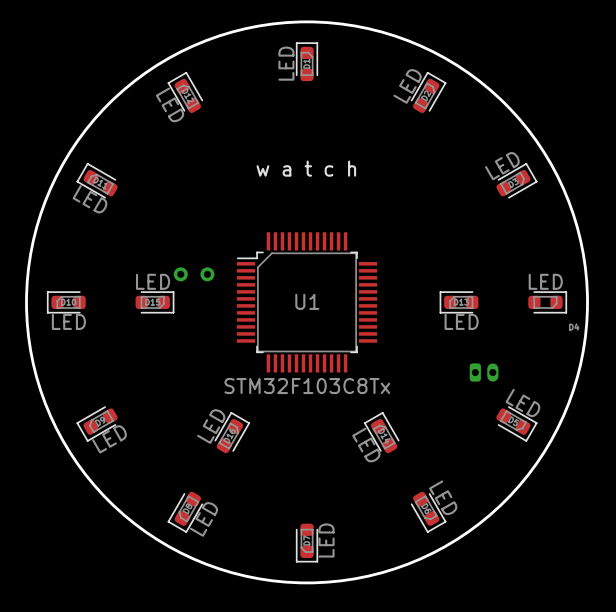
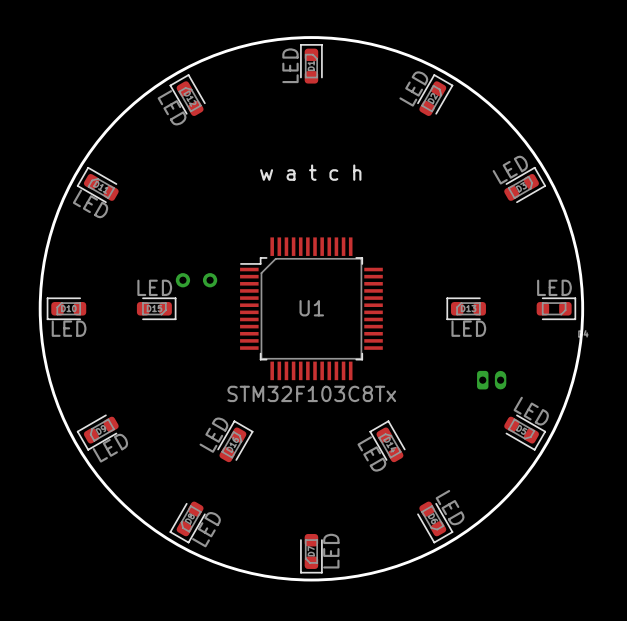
round board edge size: [25, 20, 589, 585] -> [38, 36, 585, 582]

